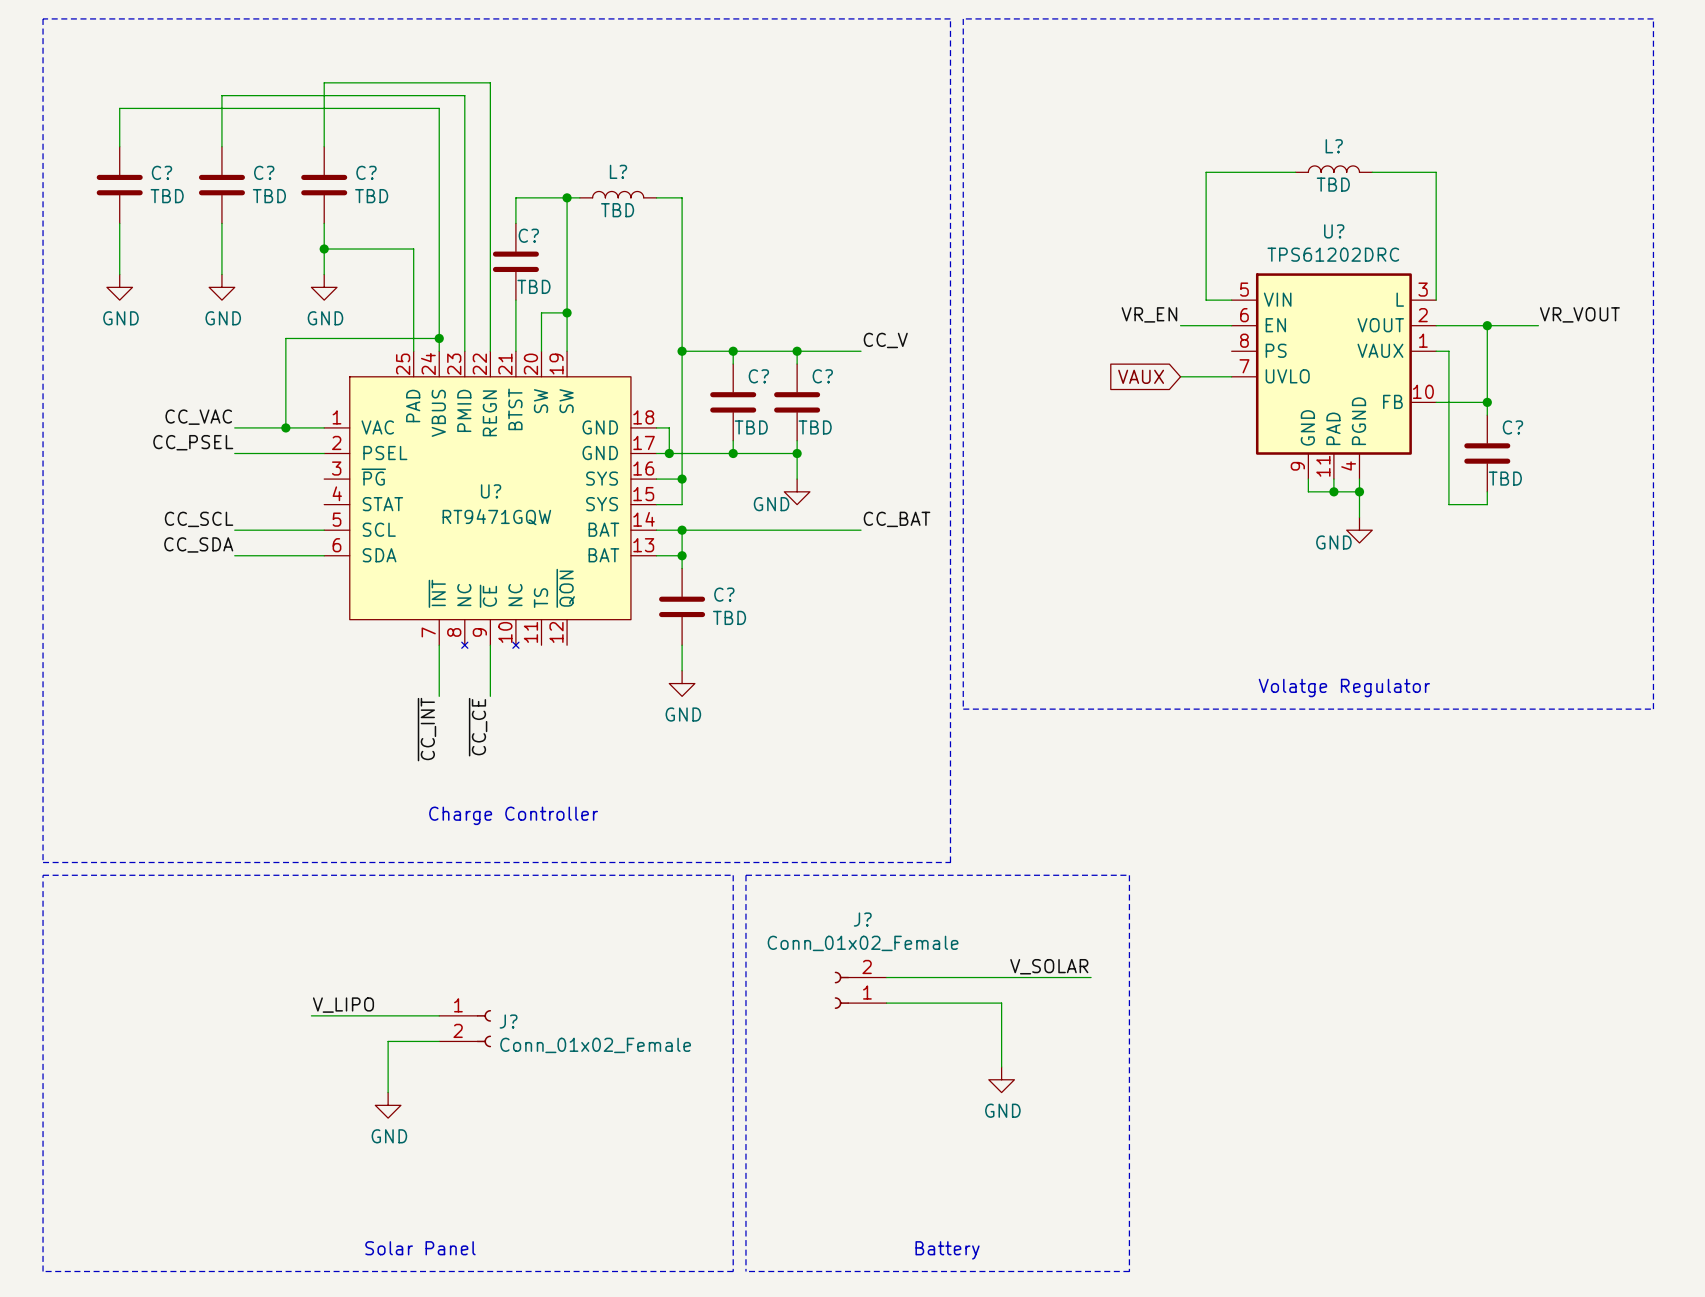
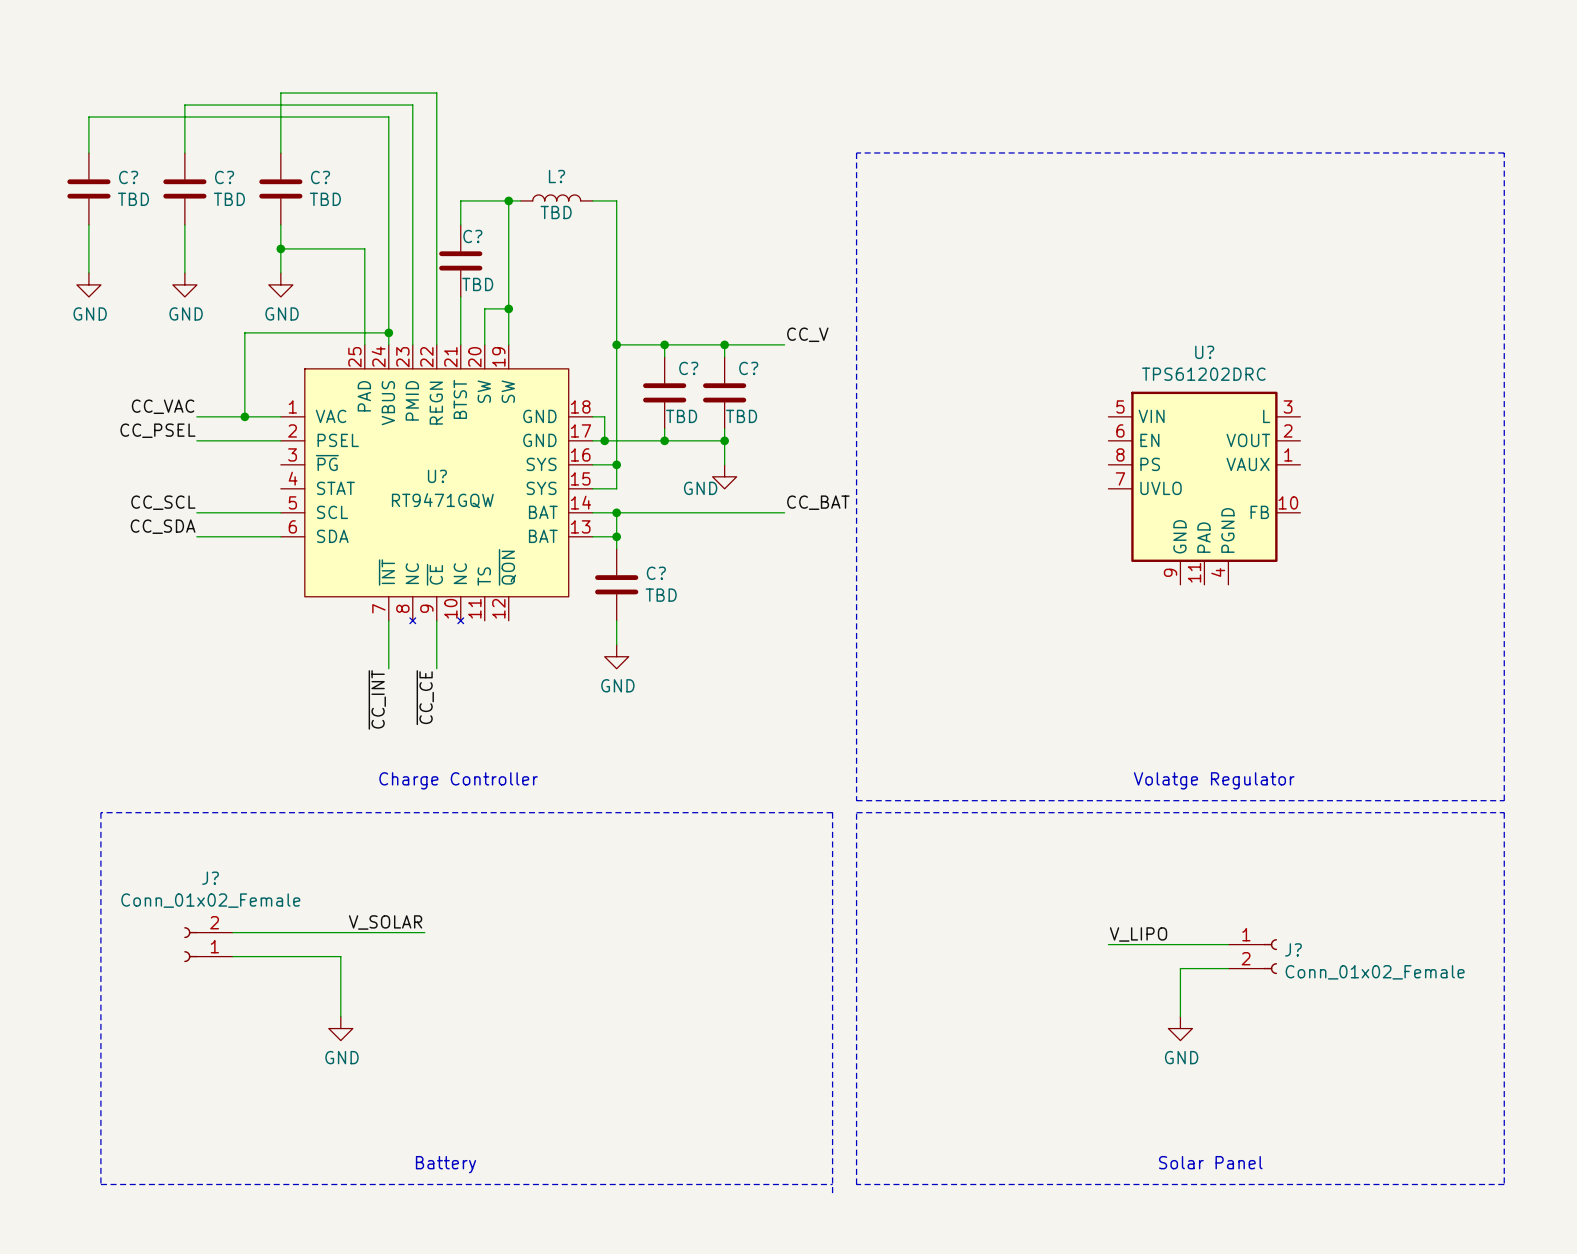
line: (43, 18) (950, 18) (950, 862) (43, 862) (43, 18) -> none
line: (963, 18) (963, 709) (1653, 709) (1653, 18) (963, 18) -> (856, 152) (856, 800) (1504, 800) (1504, 152) (856, 152)
L?: TBD (1333, 169) -> none
wire: (1295, 172) (1206, 172) (1206, 300) (1231, 300) -> none
wire: (1372, 172) (1436, 172) (1436, 300) -> none
label: VR_EN (1149, 314) -> none
label: VR_VOUT (1579, 314) -> none
wire: (1180, 325) (1231, 325) -> none
wire: (1436, 325) (1538, 325) -> none
wire: (1487, 325) (1487, 415) -> none
junction: (1487, 325) -> none
wire: (1436, 351) (1448, 351) (1448, 504) (1487, 504) (1487, 491) -> none
global label: VAUX (1141, 376) -> none
wire: (1180, 376) (1231, 376) -> none
U? position: (1333, 376) -> (1204, 488)
wire: (1436, 402) (1487, 402) -> none
junction: (1487, 402) -> none
C?: TBD (1487, 453) -> none
junction: (1333, 491) -> none
junction: (1359, 491) -> none
power symbol: GND (1359, 530) -> none
text position: Volatge Regulator (1344, 688) -> Volatge Regulator (1214, 780)
line: none -> (856, 812) (1504, 812) (1504, 1184) (856, 1184) (856, 812)
line: (43, 875) (733, 875) (733, 1271) (43, 1271) (43, 875) -> none
line: (745, 875) (745, 1271) (1129, 1271) (1129, 875) (745, 875) -> none
label: none -> V_SOLAR (385, 922)
label: V_SOLAR (1049, 966) -> none
wire: none -> (232, 932) (424, 932)
wire: (886, 977) (1091, 977) -> none
label: none -> V_LIPO (1138, 934)
J?: Conn_01x02_Female (860, 990) -> none
wire: none -> (1108, 944) (1228, 944)
wire: (886, 1003) (1001, 1003) (1001, 1067) -> none
J?: none -> Conn_01x02_Female (1252, 956)
label: V_LIPO (343, 1005) -> none
wire: (311, 1015) (439, 1015) -> none
wire: none -> (1228, 968) (1180, 968) (1180, 1016)
J? name position: J? (508, 1021) -> J? (210, 878)
J? position: (465, 1028) -> (208, 944)
J? rotation: 0° (483, 1028) -> 180° (190, 944)
wire: (388, 1041) (439, 1041) -> (340, 992) (340, 956) (232, 956)
J? value position: Conn_01x02_Female (595, 1045) -> Conn_01x02_Female (210, 900)
power symbol: GND (1001, 1079) -> none
power symbol: none -> GND (1180, 1028)
power symbol position: GND (388, 1105) -> GND (340, 1028)
text: none -> Solar Panel (1210, 1162)
text: none -> Battery (445, 1164)
line: none -> (832, 1184) (100, 1184) (100, 812) (832, 812) (832, 1196)
text: Solar Panel (420, 1248) -> none
text: Battery (947, 1250) -> none

